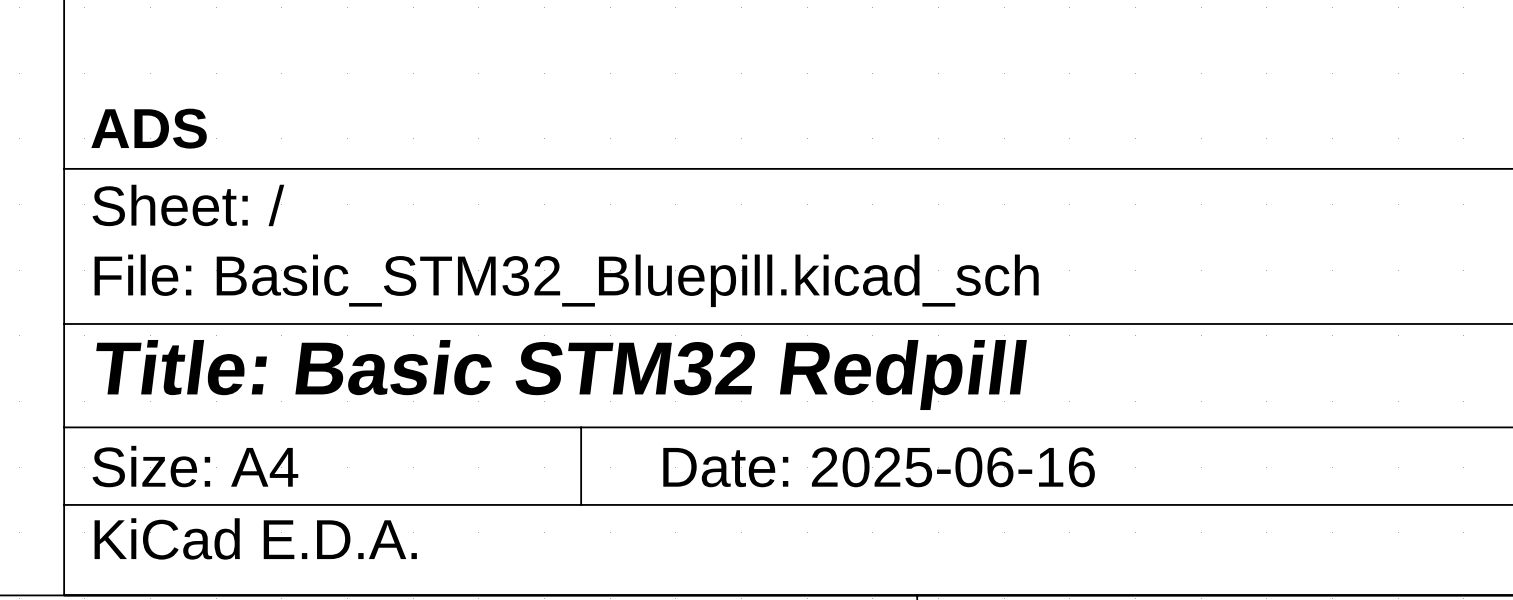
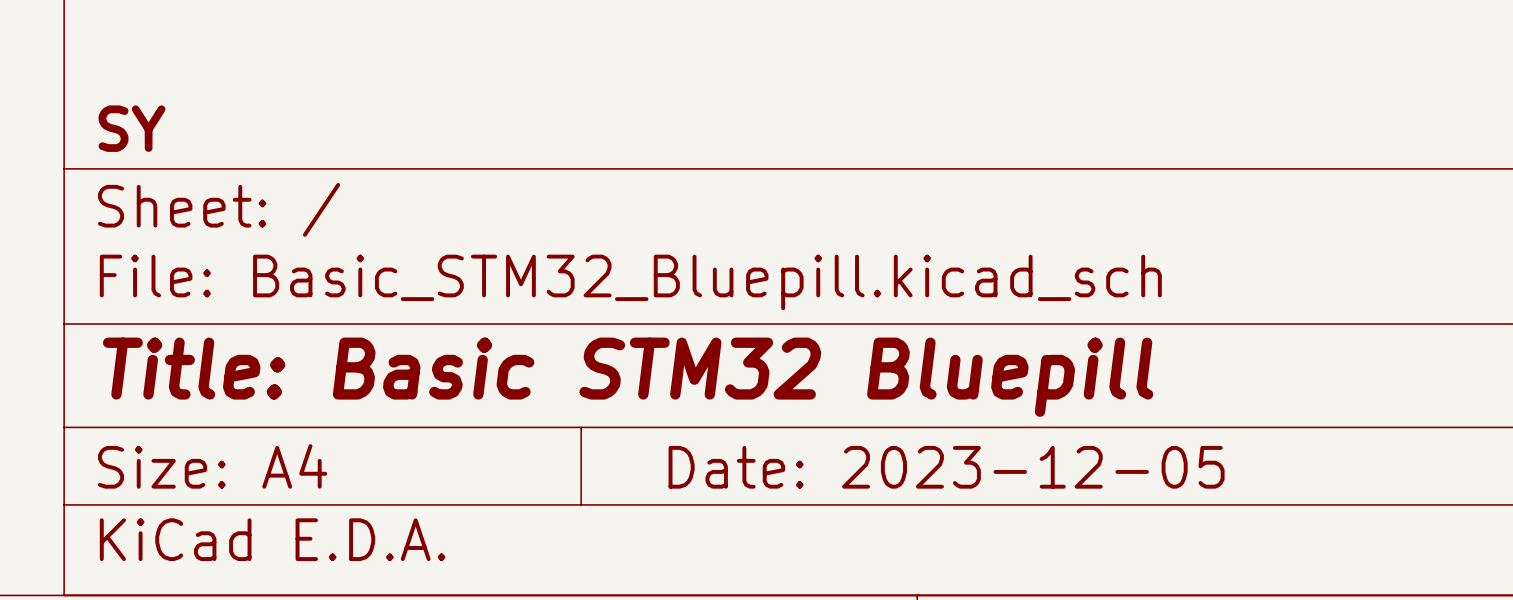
title block: ADS (149, 128) -> SY (132, 128)
title block: Title: Basic STM32 Redpill (561, 375) -> Title: Basic STM32 Bluepill (628, 377)
title block: Date: 2025-06-16 (879, 467) -> Date: 2023-12-05 (946, 467)

